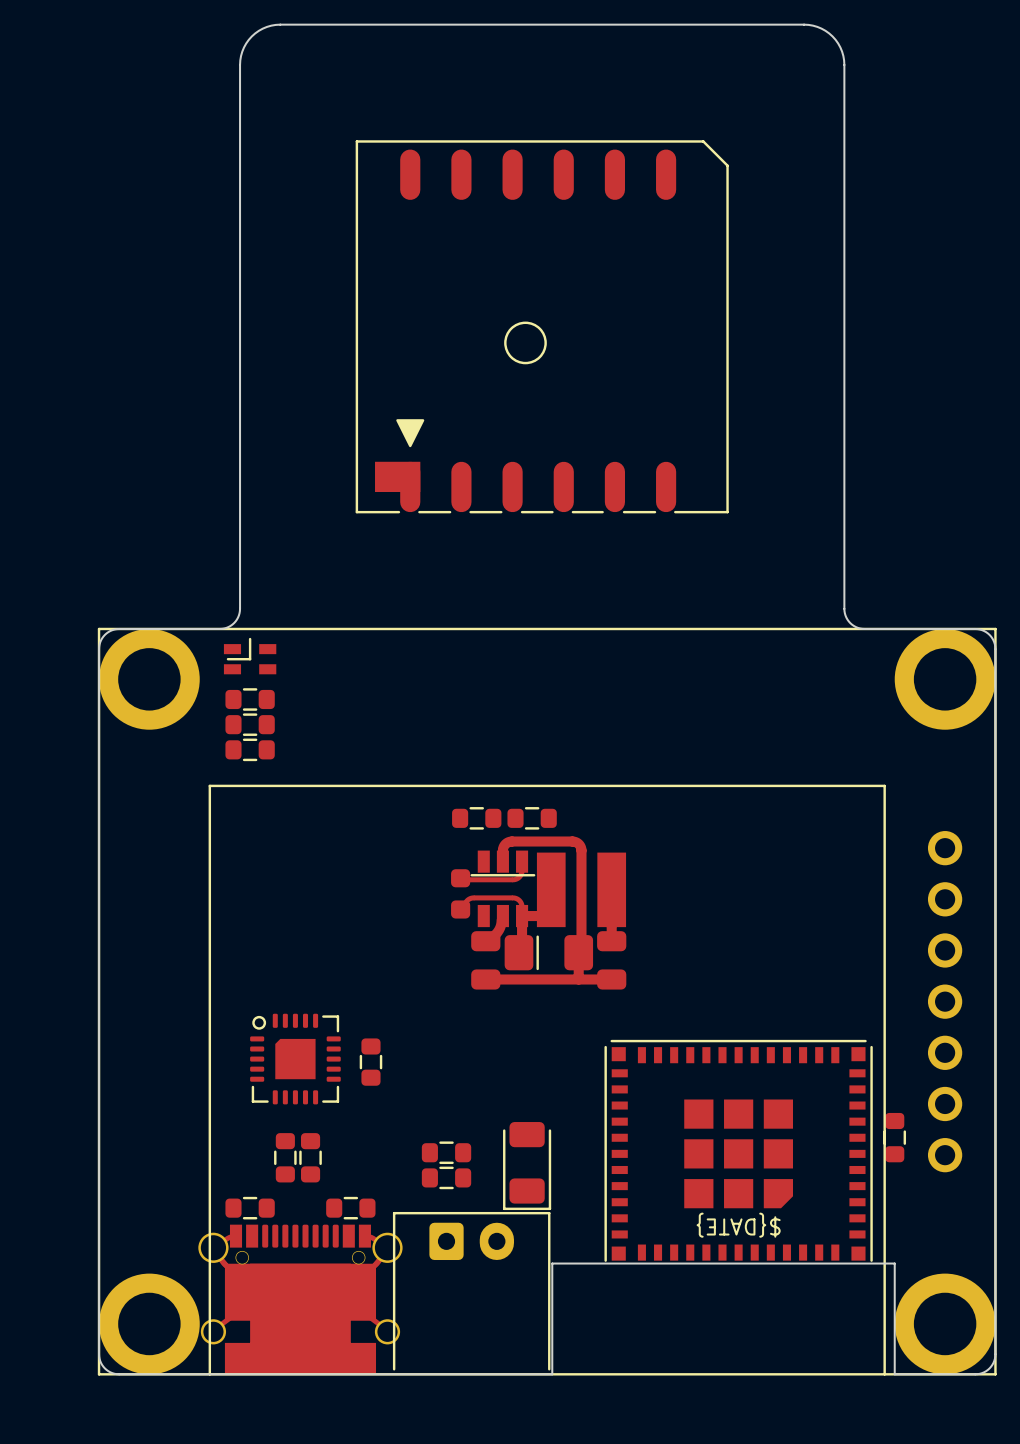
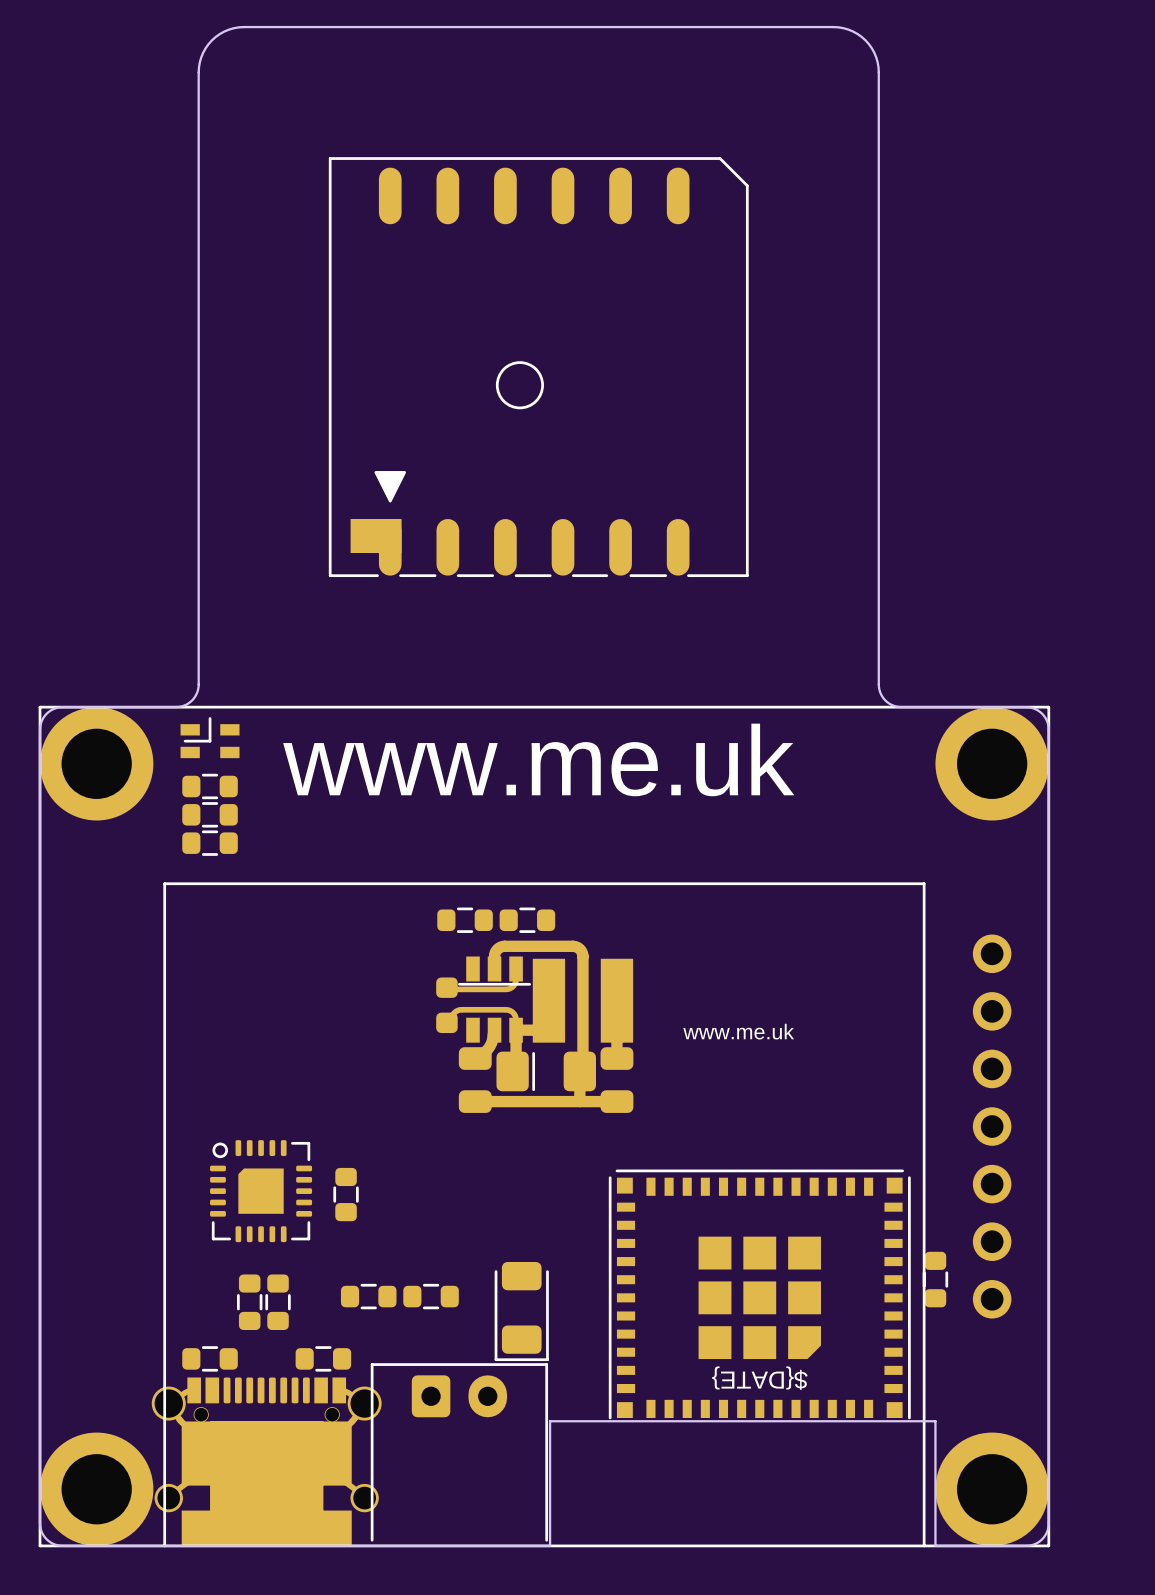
text: none -> www.me.uk (538, 759)
drawing: none -> [683, 1023, 795, 1040]
part position: (446, 1177) -> (368, 1296)

